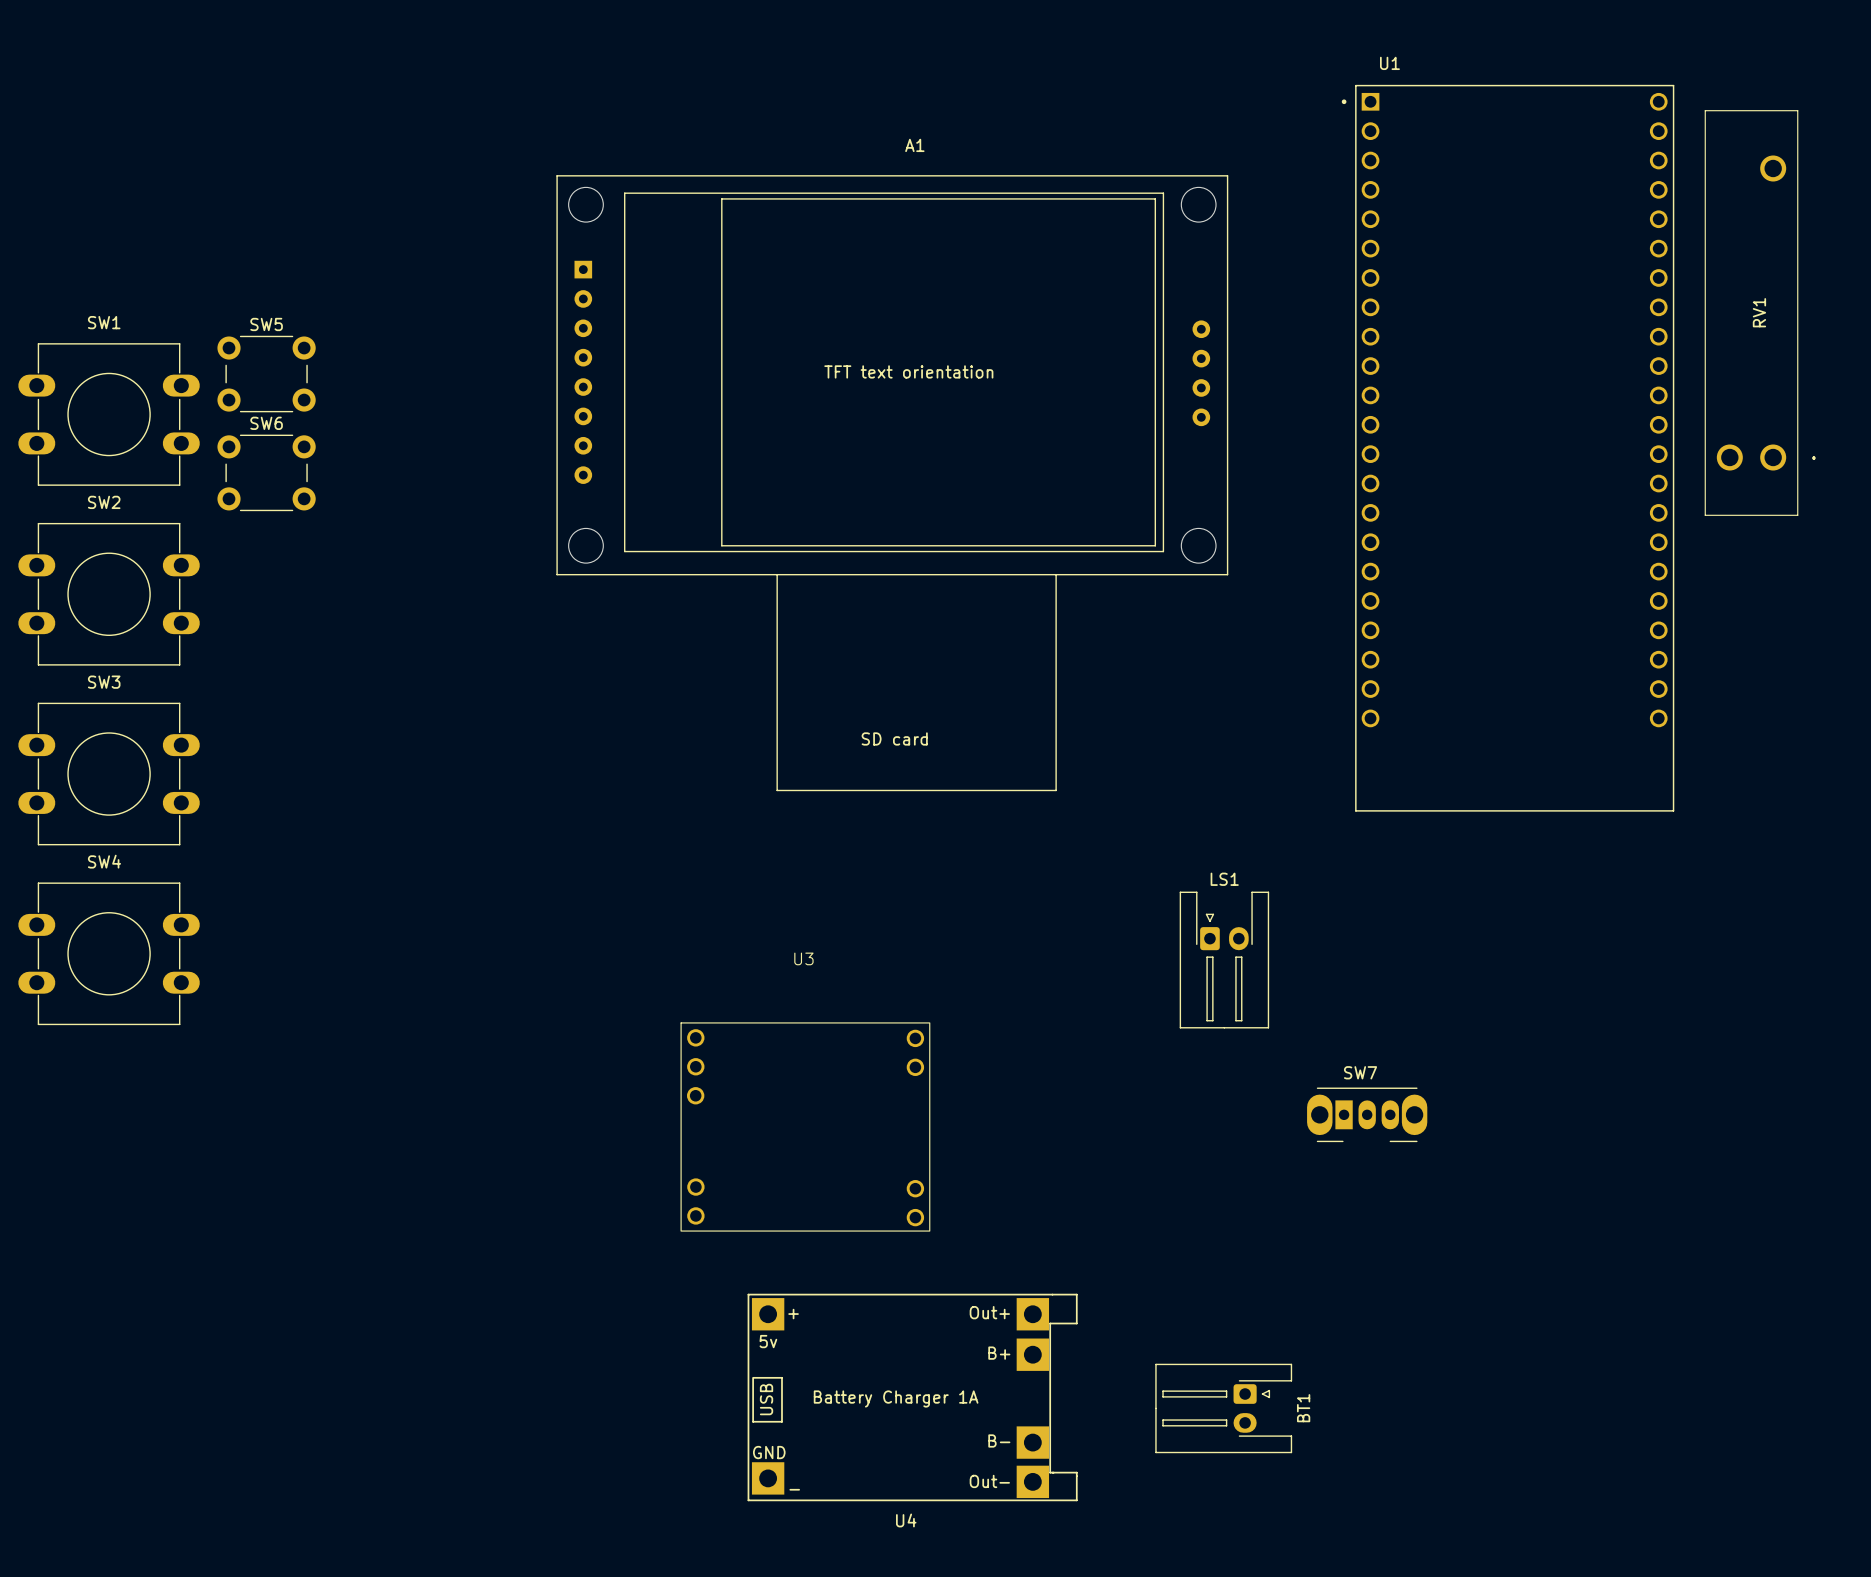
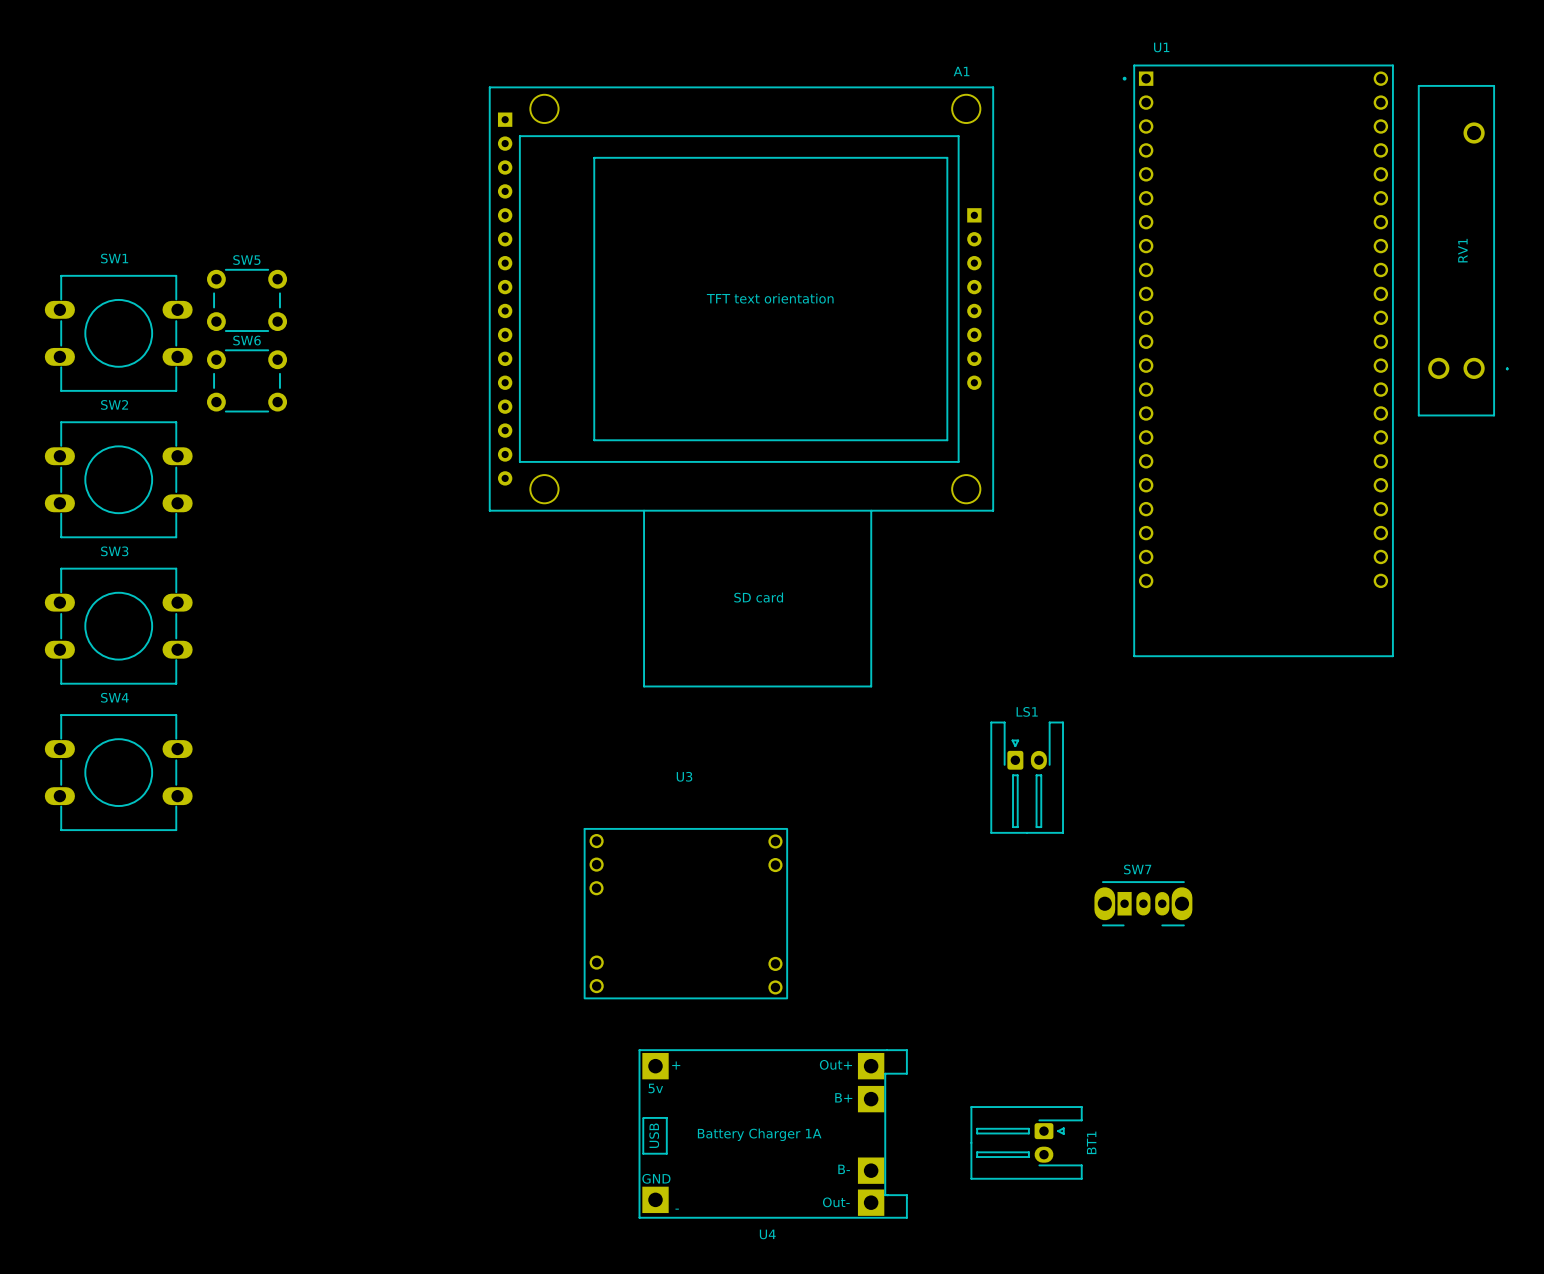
A1 name position: A1 (914, 145) -> A1 (961, 71)
A1 footprint: [556, 175, 1229, 792] -> [489, 86, 994, 688]

